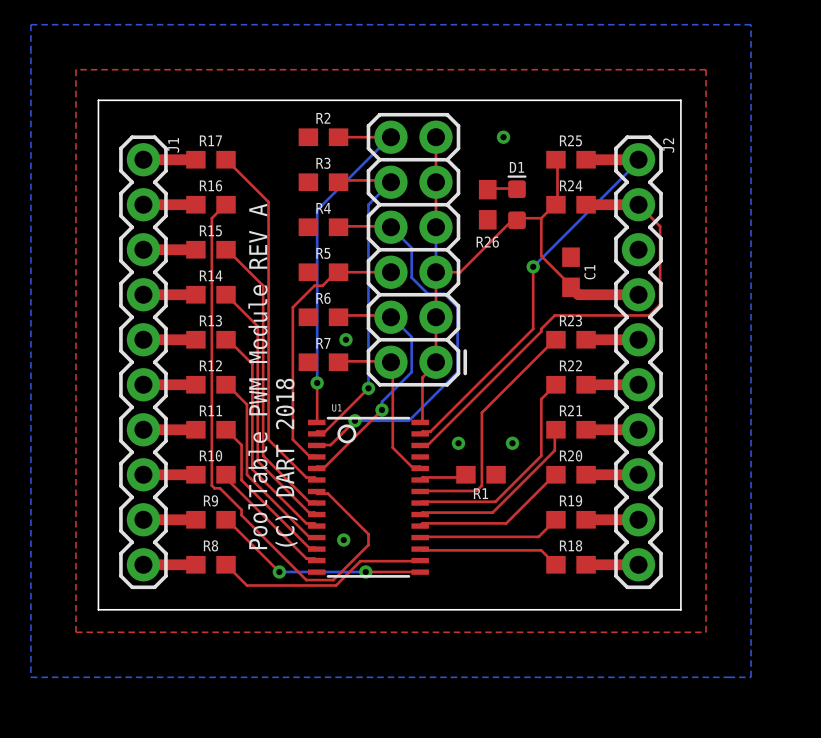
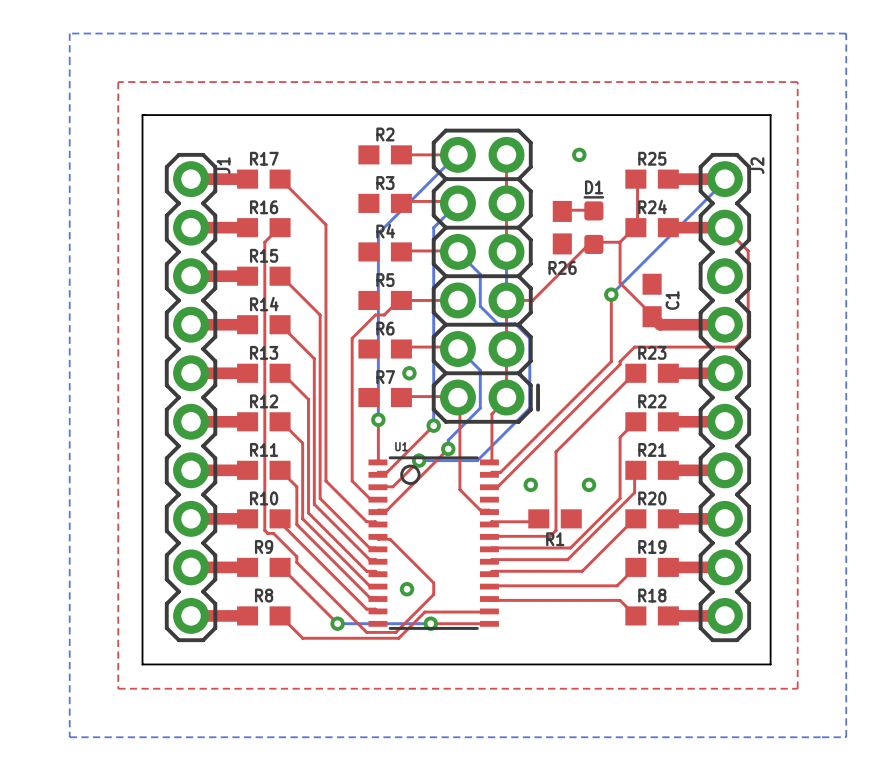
text: PoolTable PWM Module REV A (257, 376) -> none
text: (C) DART 2018 (286, 462) -> none

